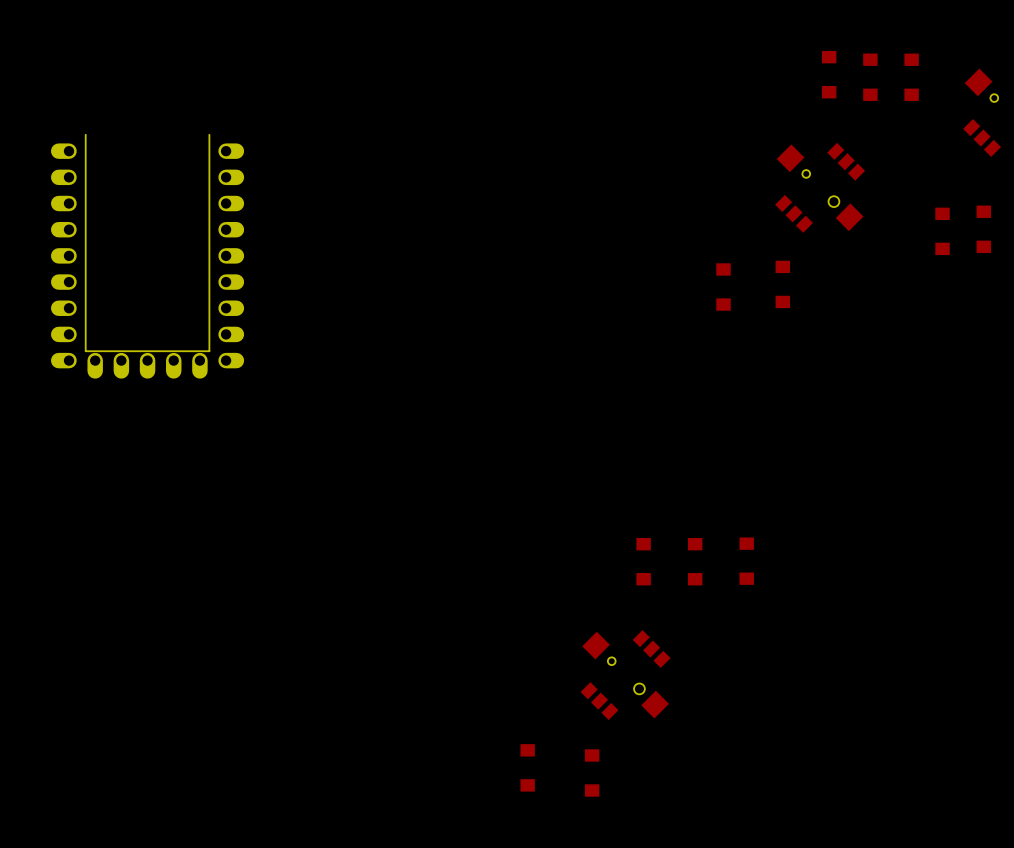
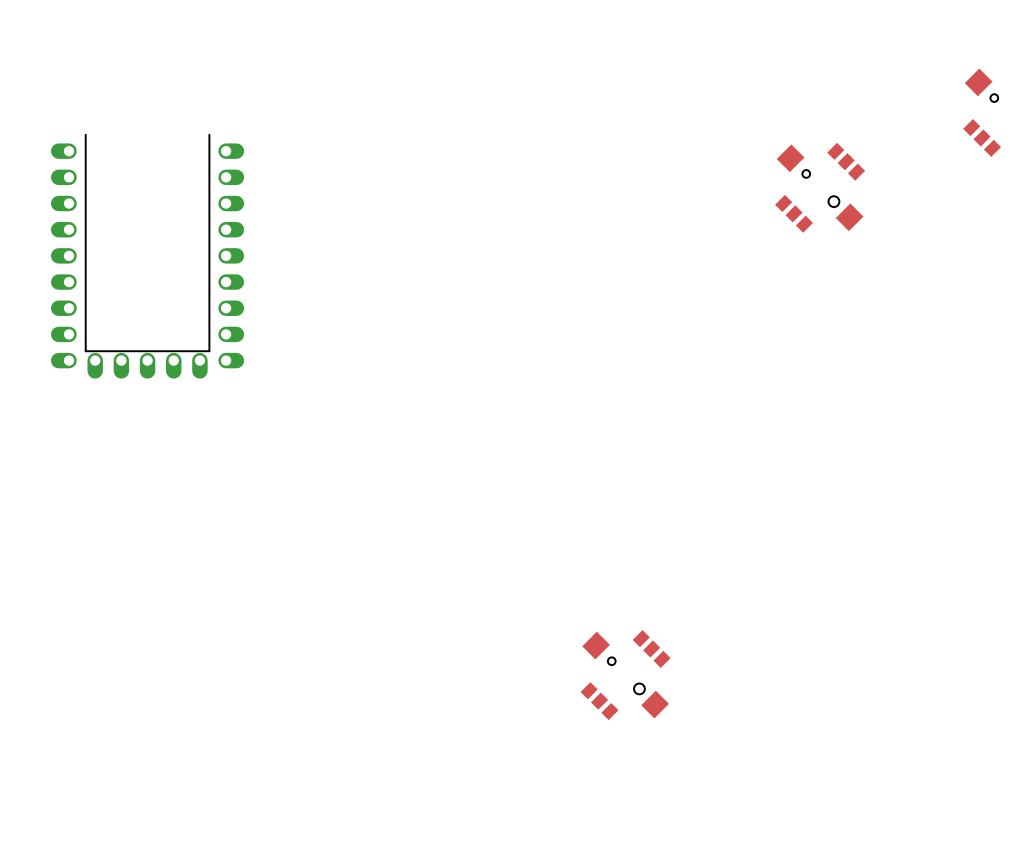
part: (829, 74) -> none
part: (870, 77) -> none
part: (911, 77) -> none
part: (983, 229) -> none
part: (942, 231) -> none
part: (782, 284) -> none
part: (723, 287) -> none
part: (643, 561) -> none
part: (695, 561) -> none
part: (746, 561) -> none
part: (527, 767) -> none
part: (592, 772) -> none

